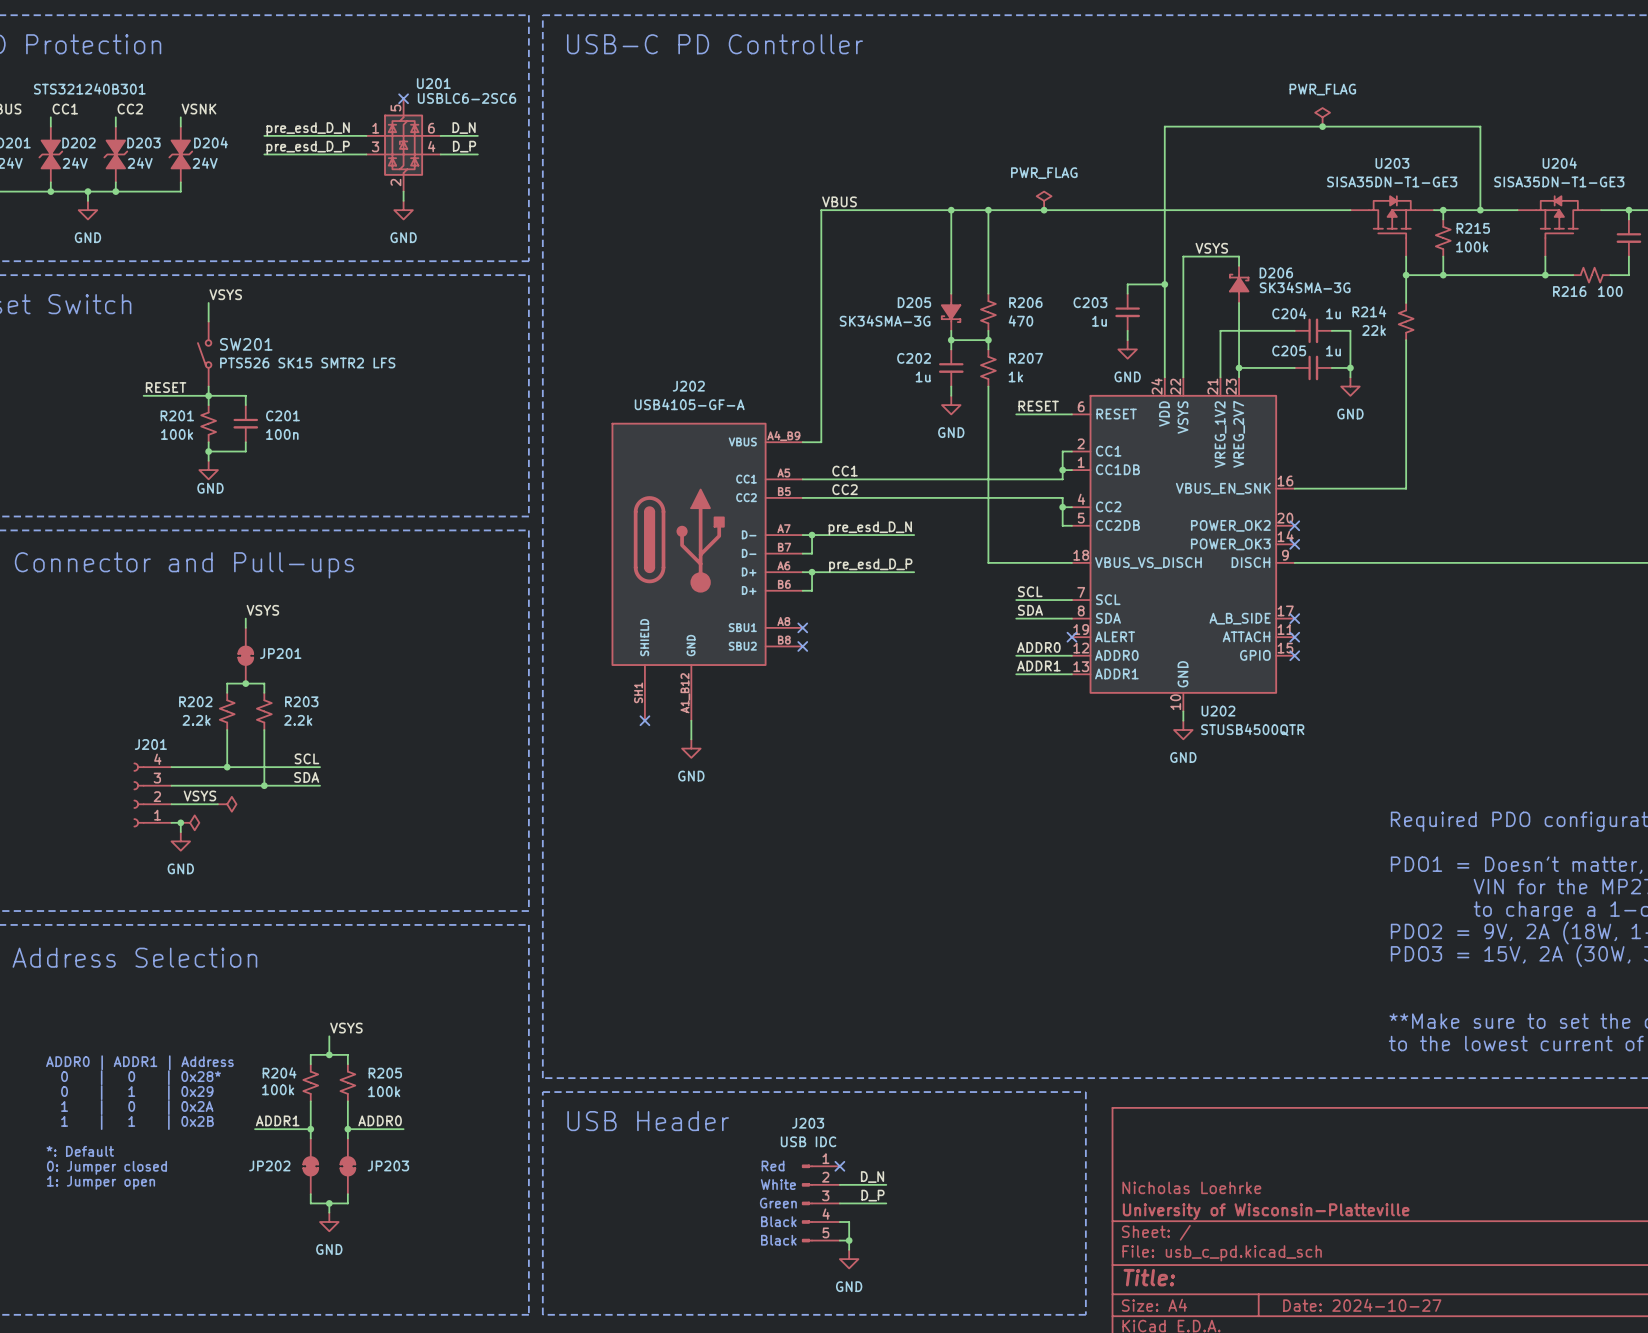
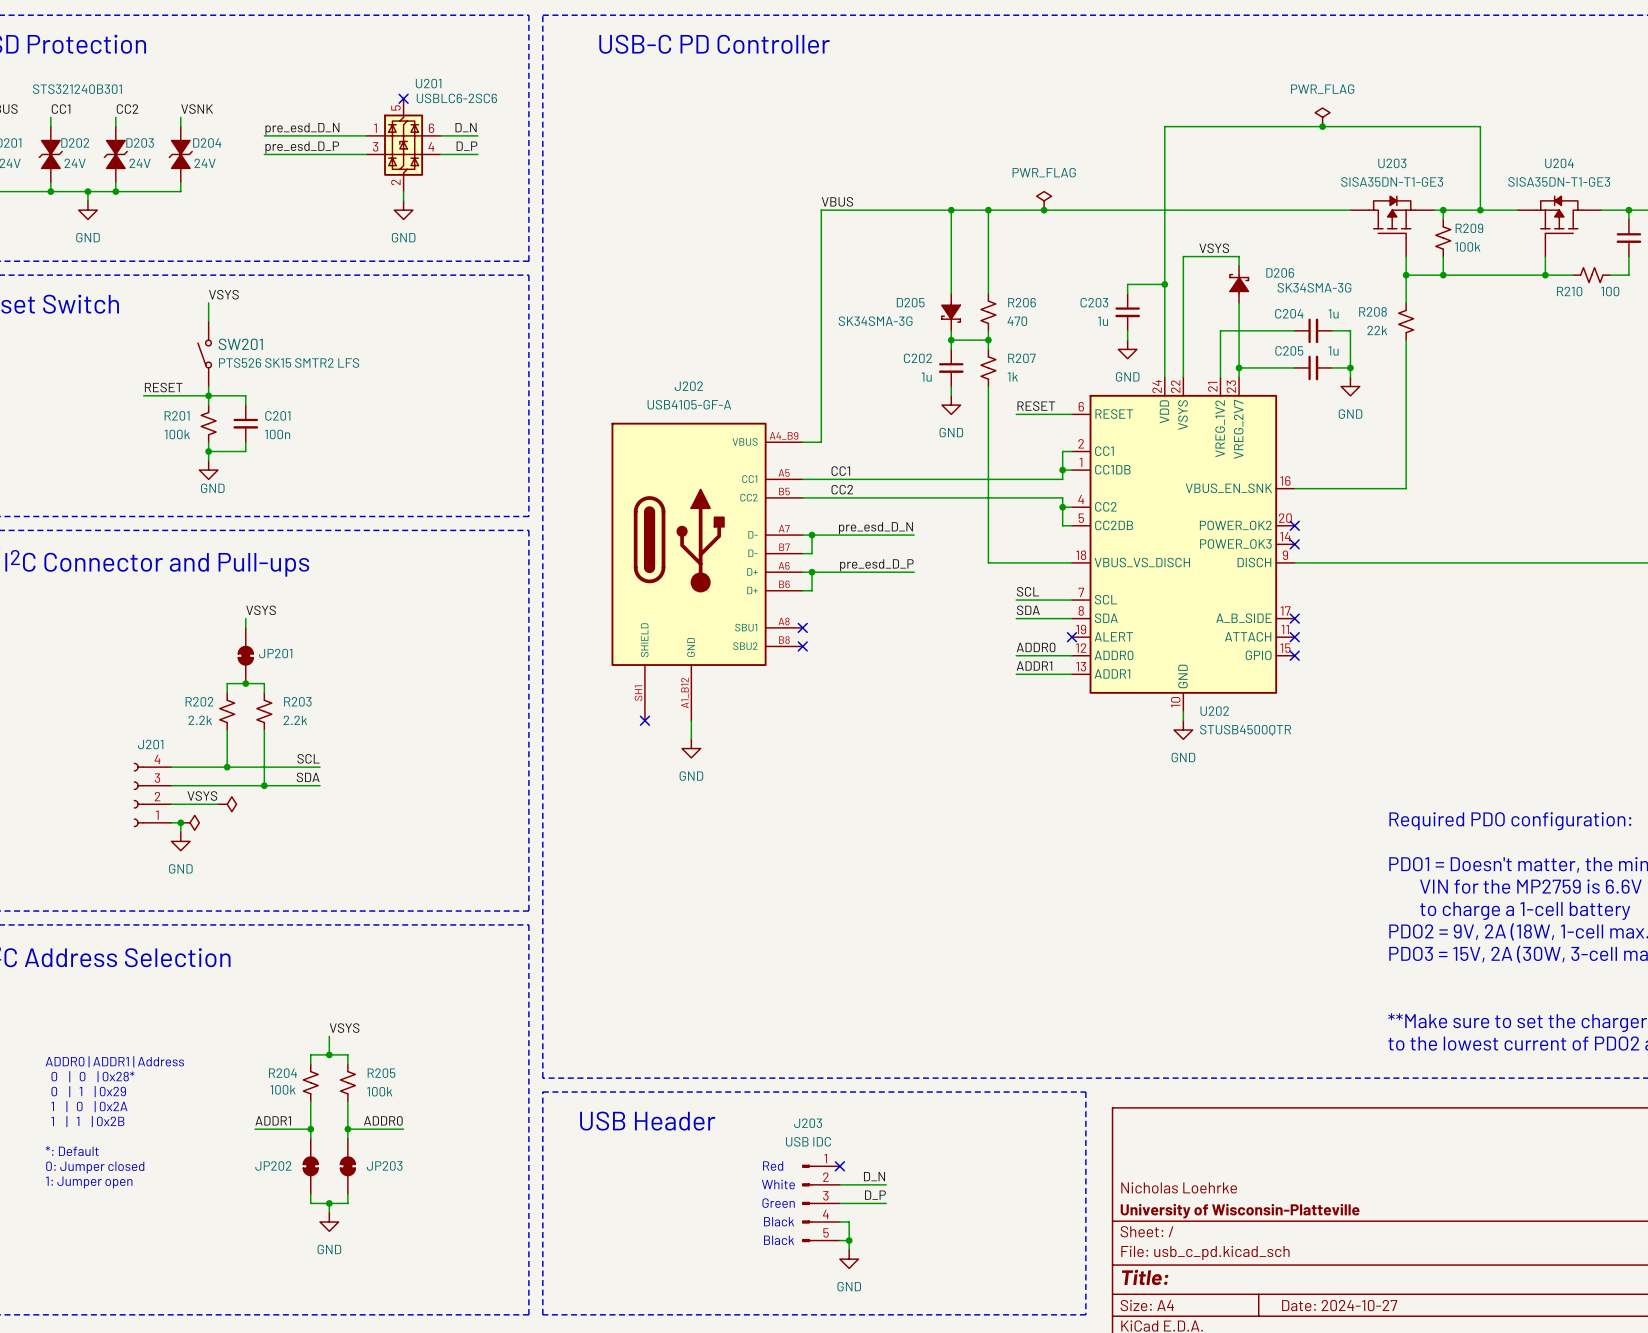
R215 name: R215 (1473, 228) -> R209 (1469, 228)
R216 name: R216 (1569, 291) -> R210 (1569, 291)
R214 name: R214 (1369, 311) -> R208 (1372, 311)

